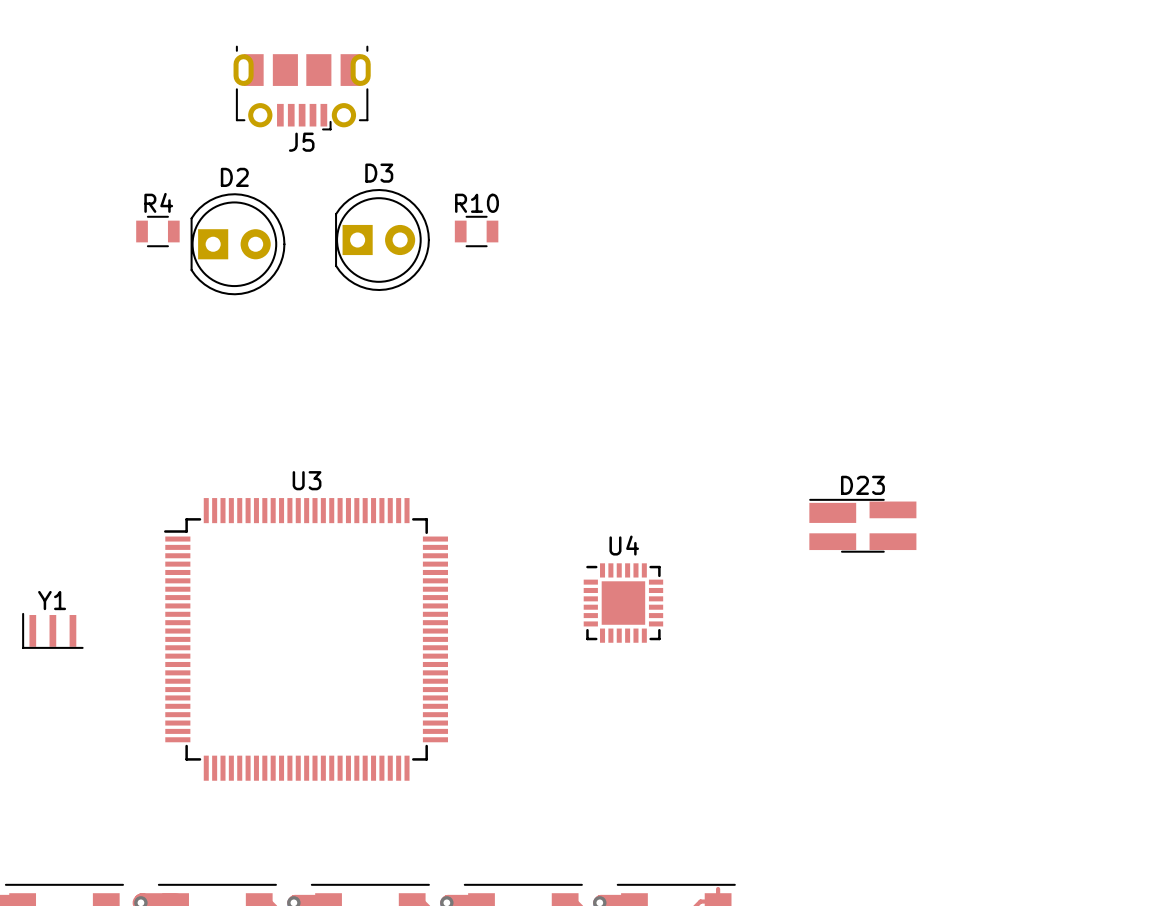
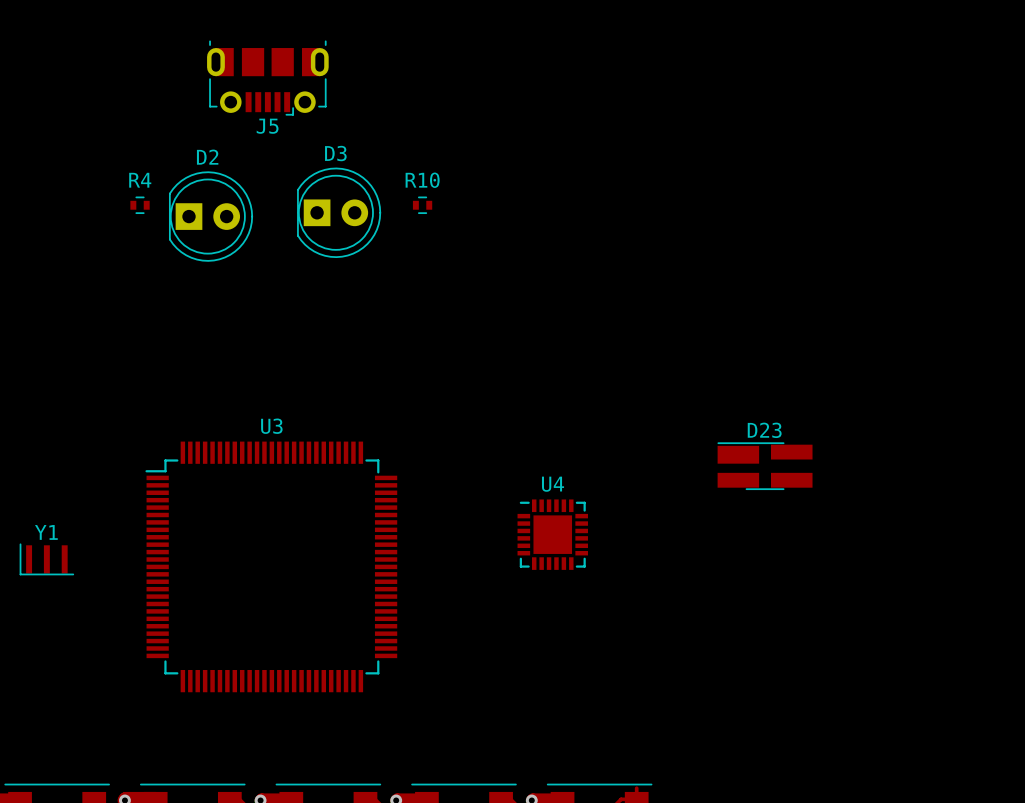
R4 footprint: [136, 215, 180, 248] -> [130, 196, 150, 215]
R10 footprint: [454, 215, 499, 248] -> [412, 196, 433, 215]

